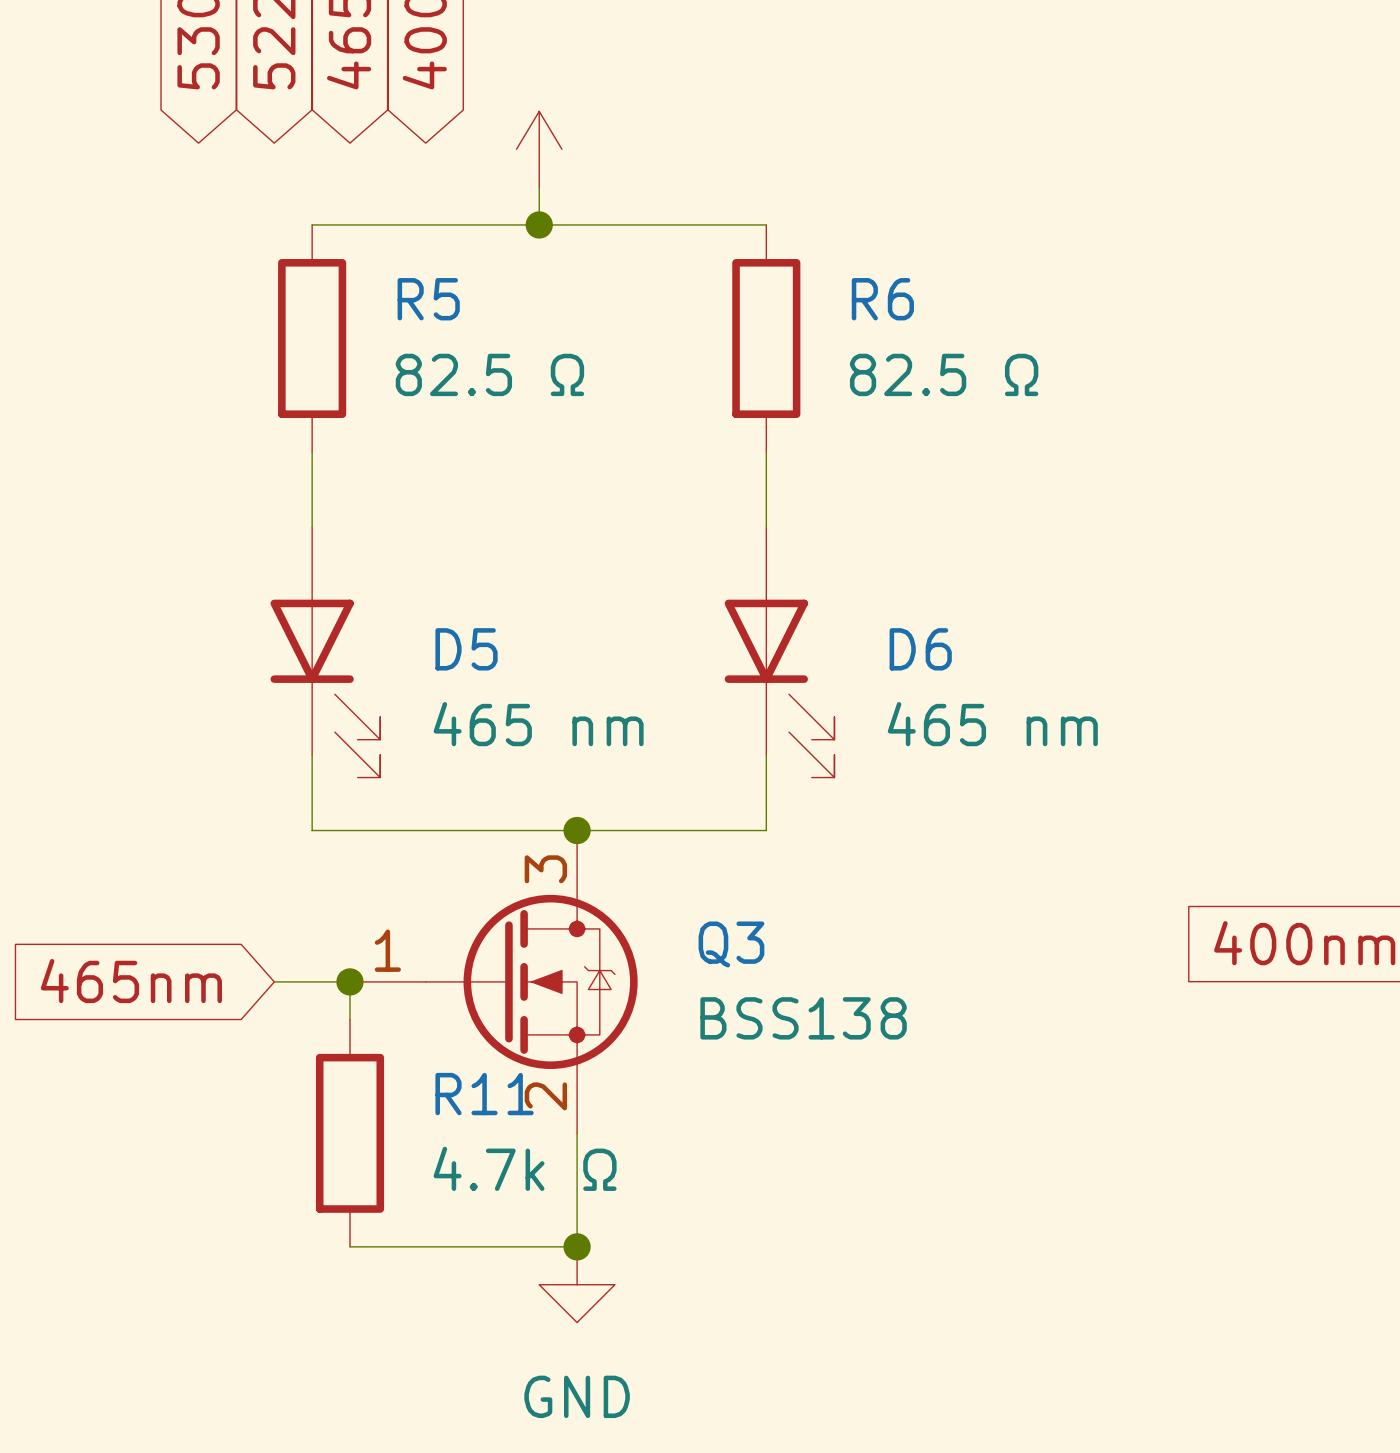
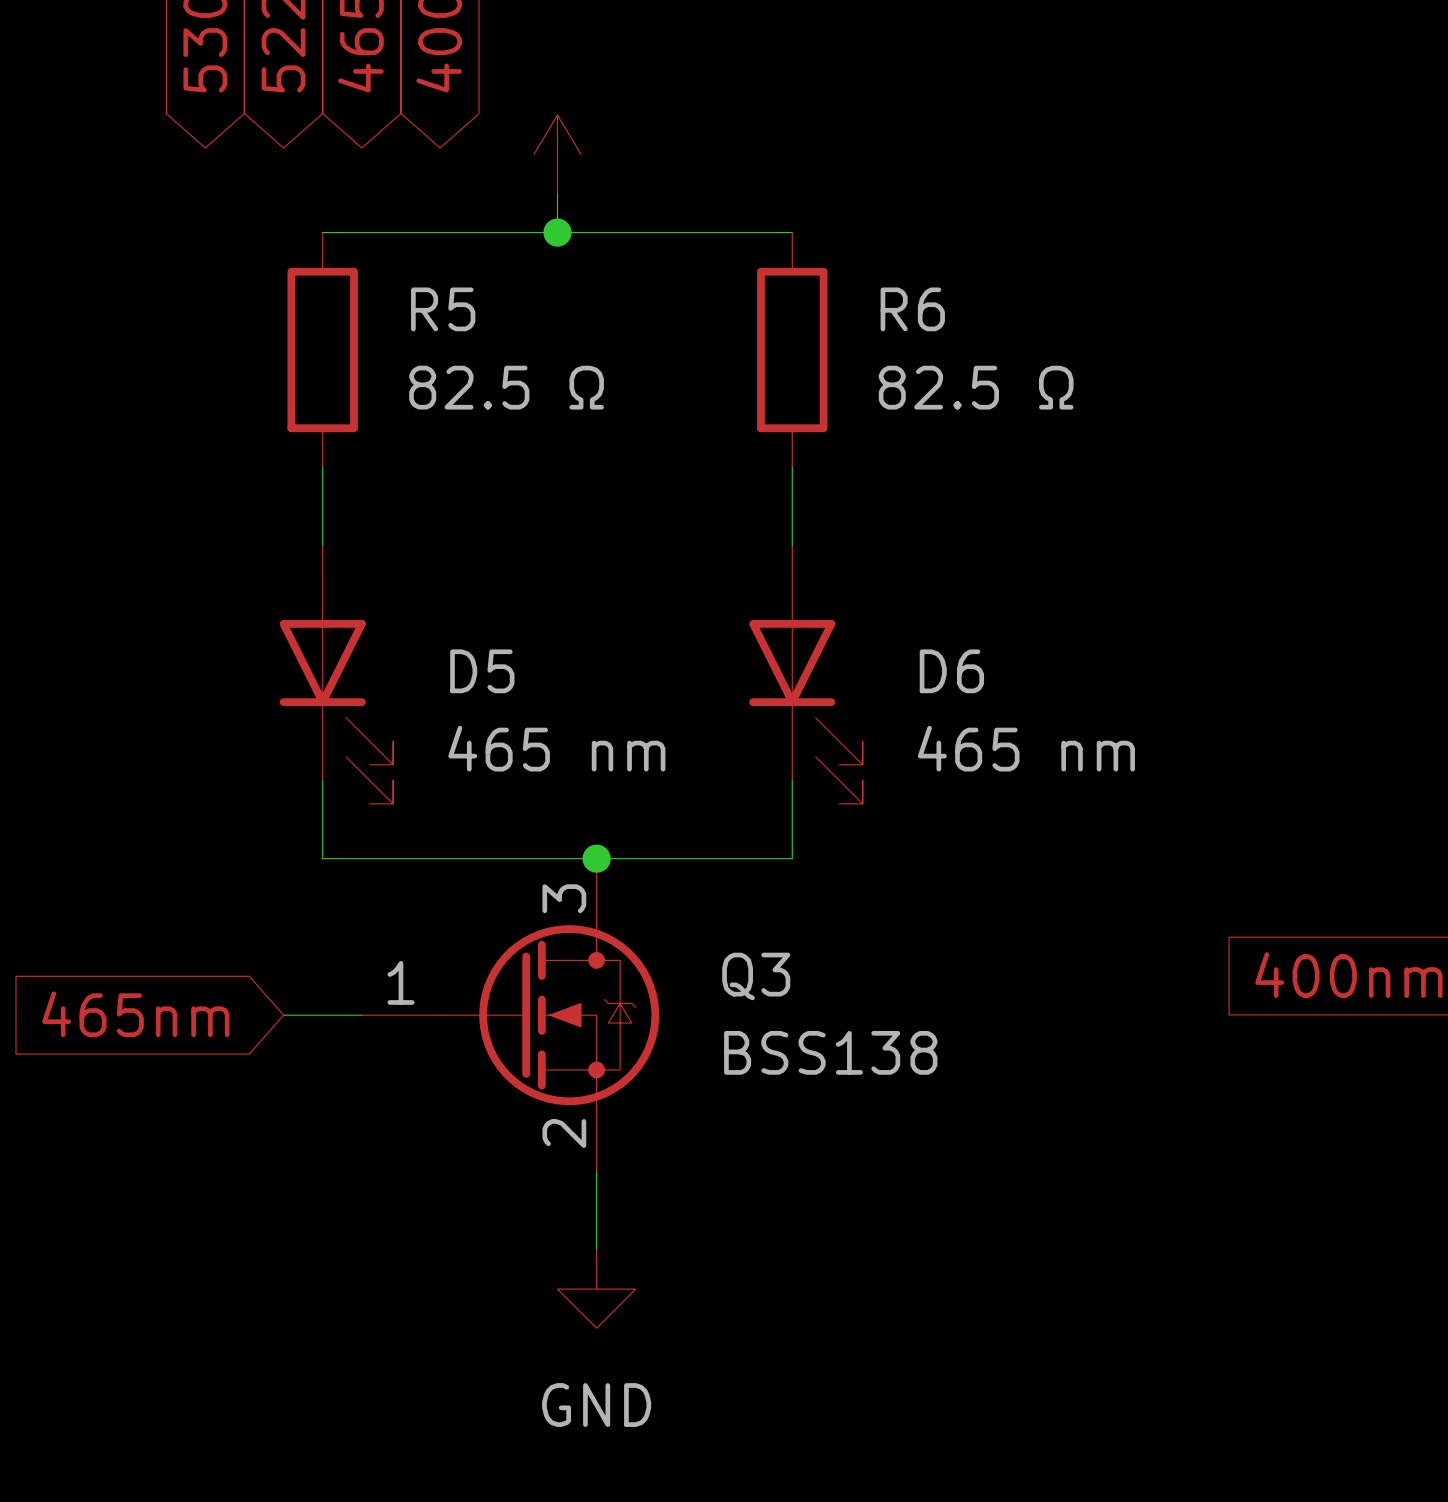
wire: (349, 981) (349, 1019) -> none
junction: (349, 981) -> none
R11: 4.7k Ω (349, 1133) -> none
wire: (577, 1209) (577, 1246) (349, 1246) -> none
junction: (577, 1246) -> none
power symbol position: GND (577, 1284) -> GND (596, 1289)

